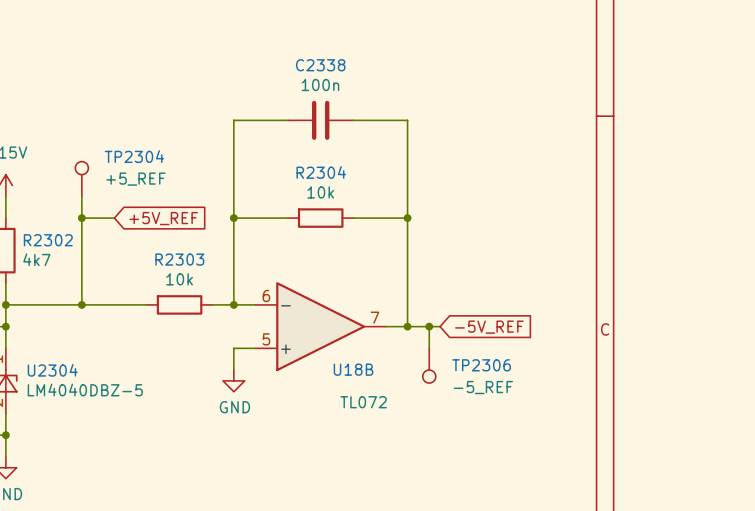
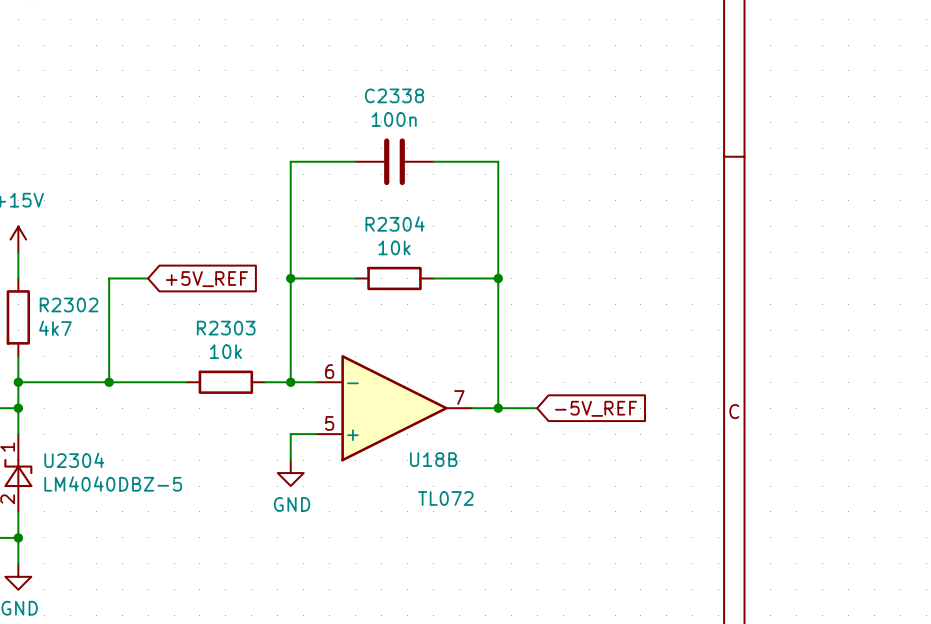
TP2304: +5_REF (81, 178) -> none
wire: (81, 196) (81, 218) -> none
junction: (81, 218) -> none
wire: (429, 326) (429, 348) -> none
junction: (429, 326) -> none
TP2306: -5_REF (429, 365) -> none

